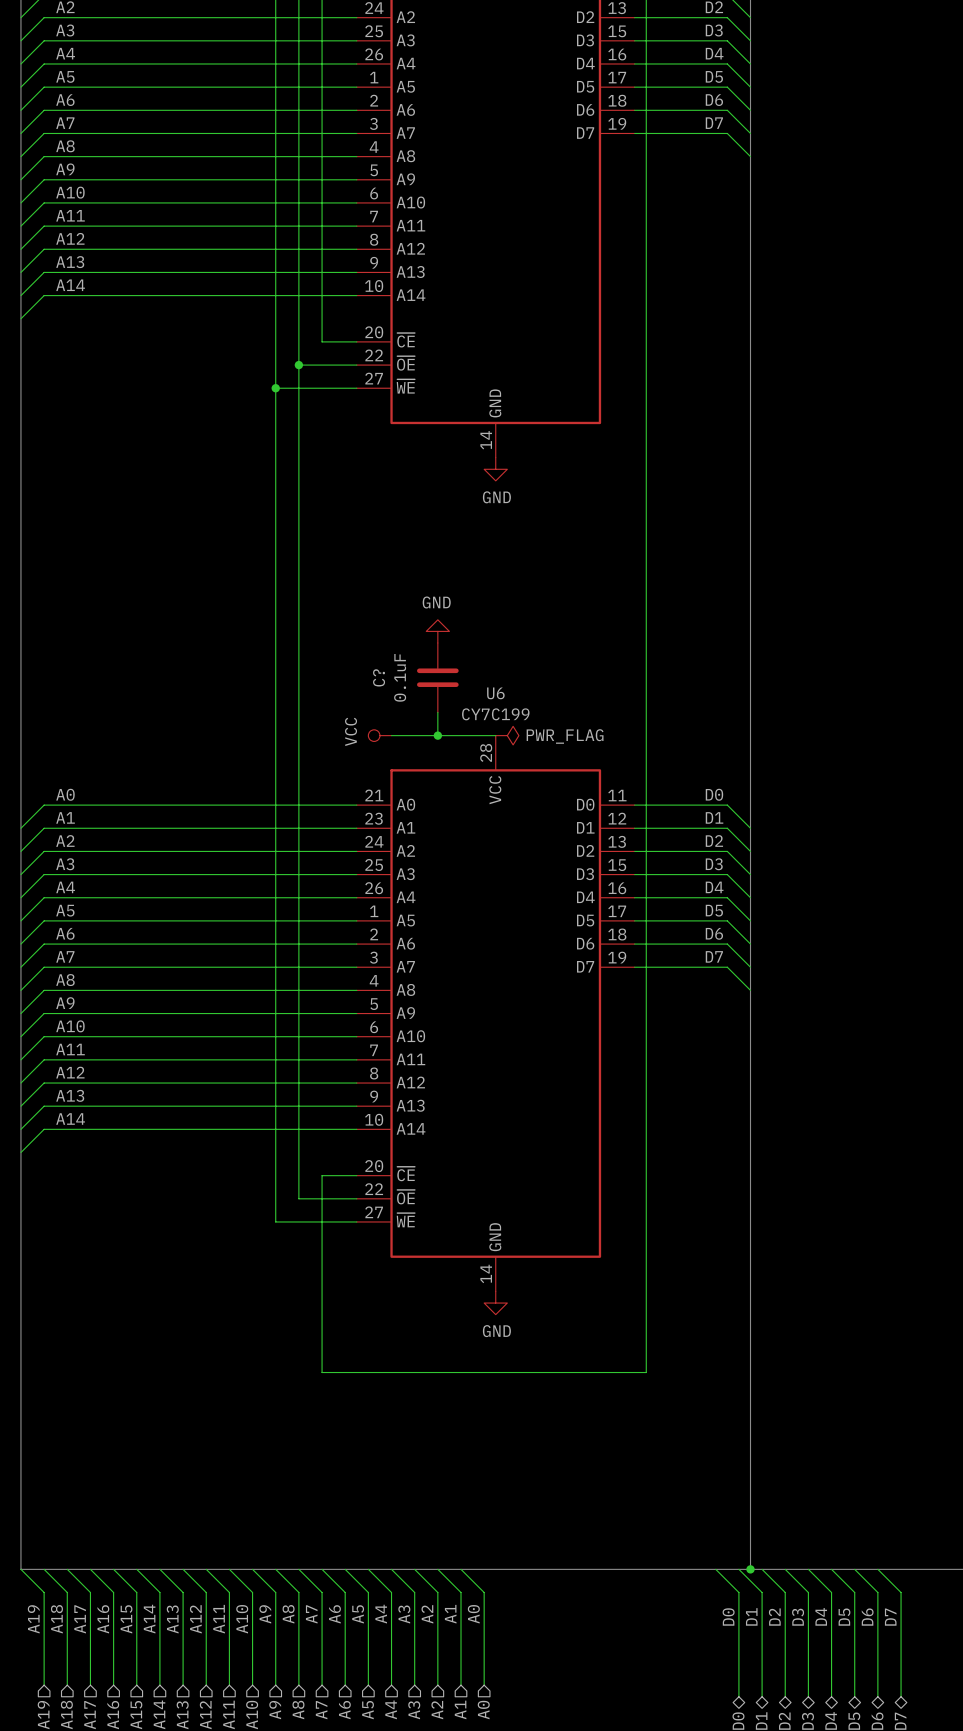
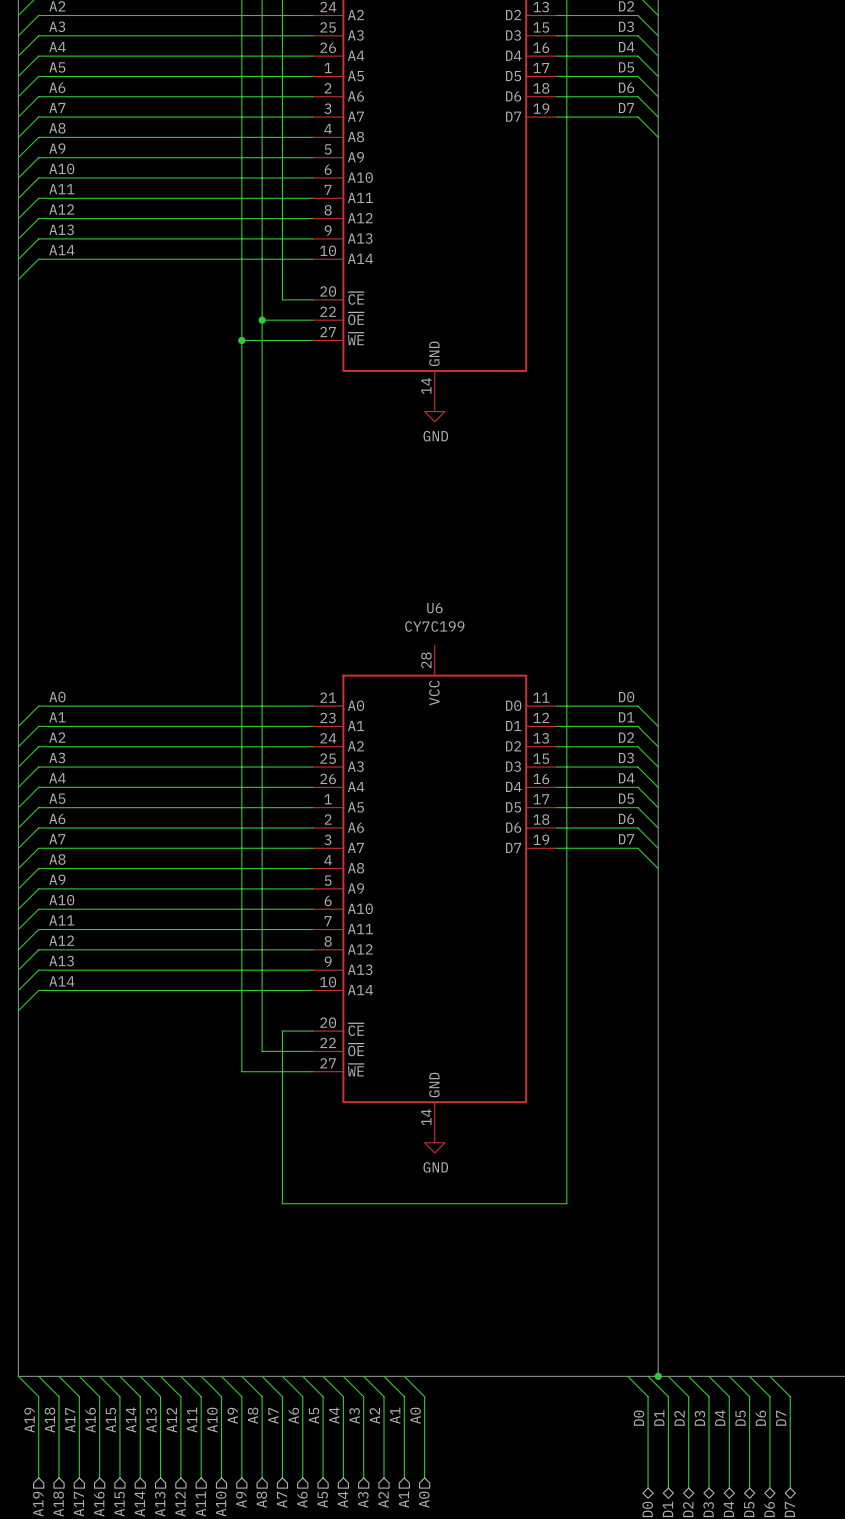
power symbol: GND (437, 631) -> none
C?: 0.1uF (437, 677) -> none
wire: (437, 712) (437, 735) -> none
power symbol: VCC (379, 735) -> none
wire: (391, 735) (495, 735) -> none
junction: (437, 735) -> none
power symbol: PWR_FLAG (507, 735) -> none

